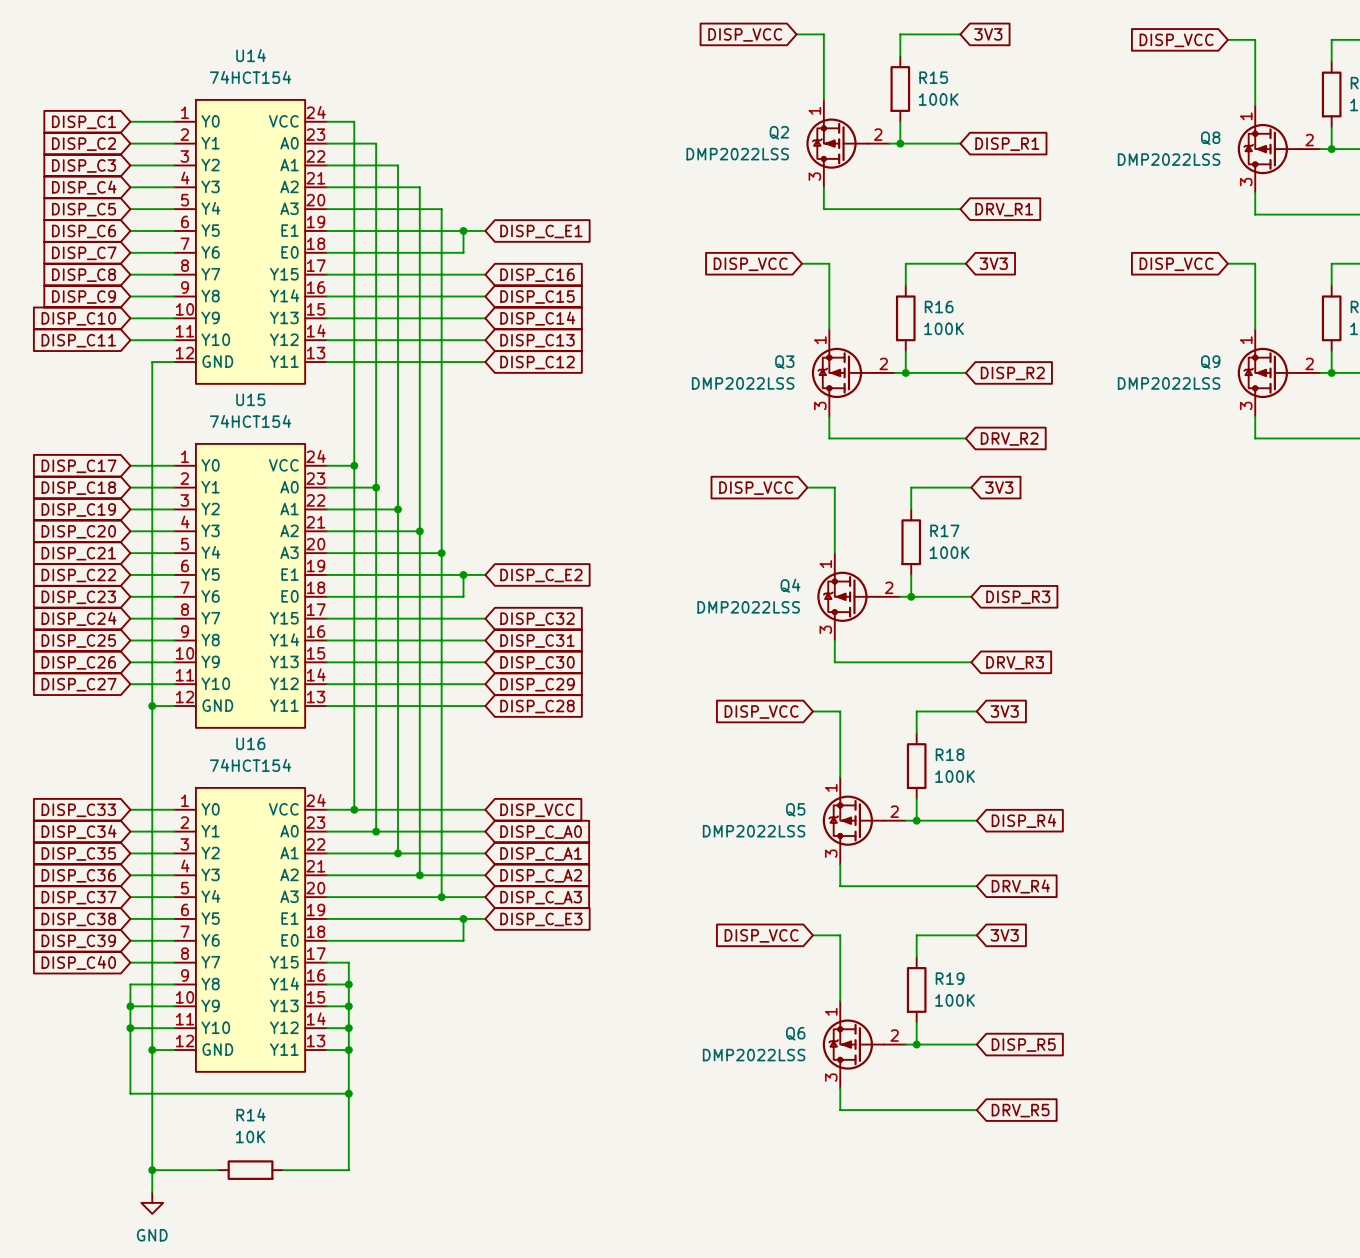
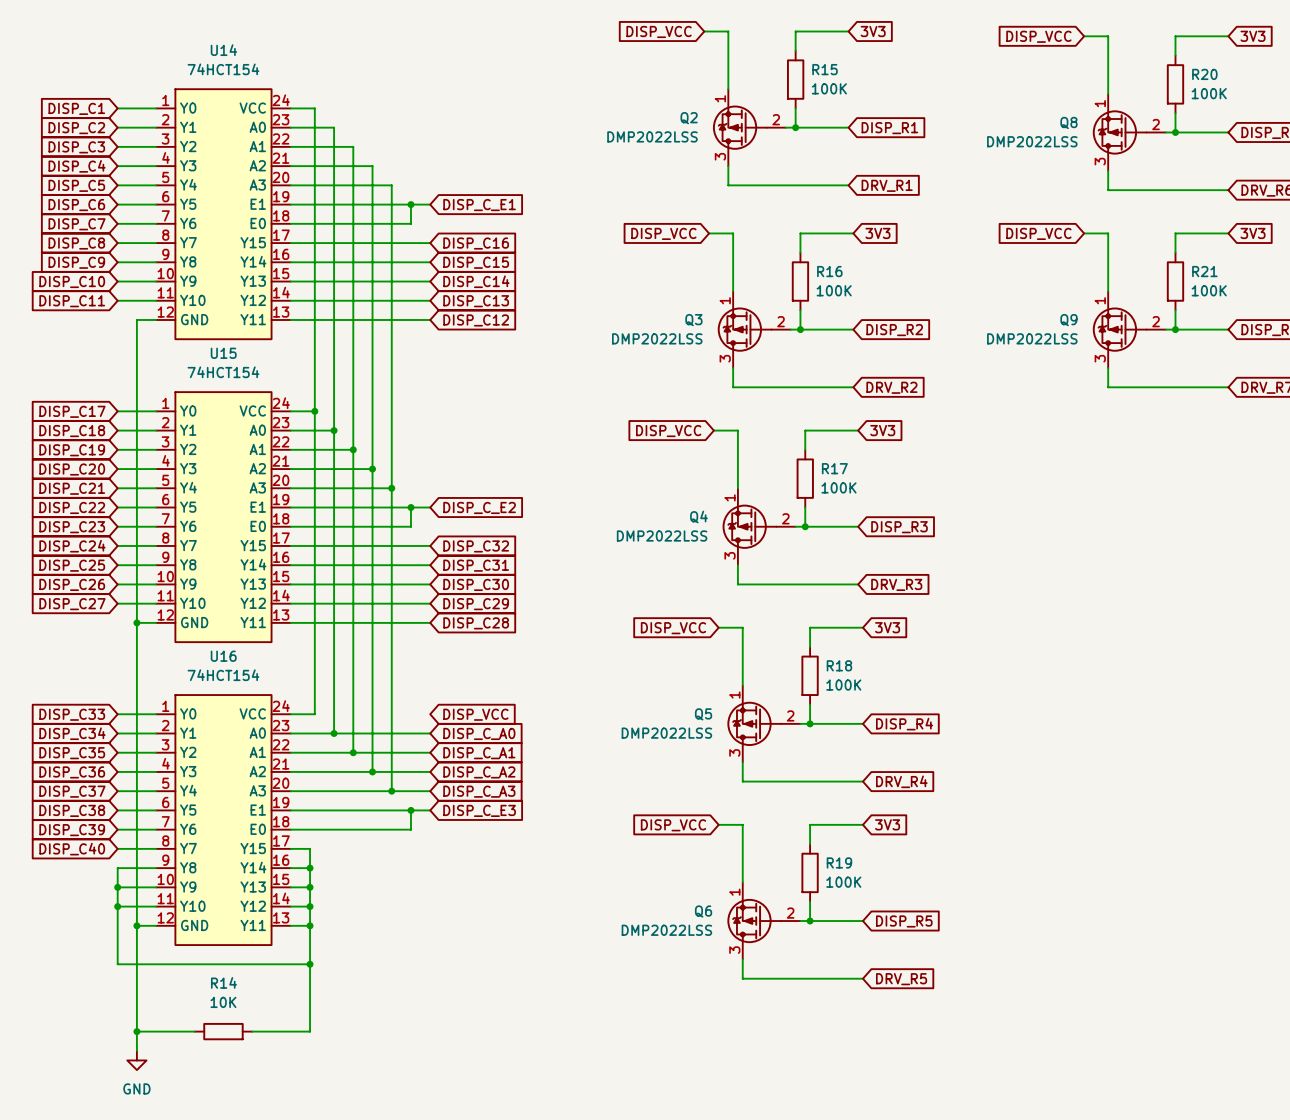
wire: (354, 809) (485, 809) -> none
junction: (354, 809) -> none

